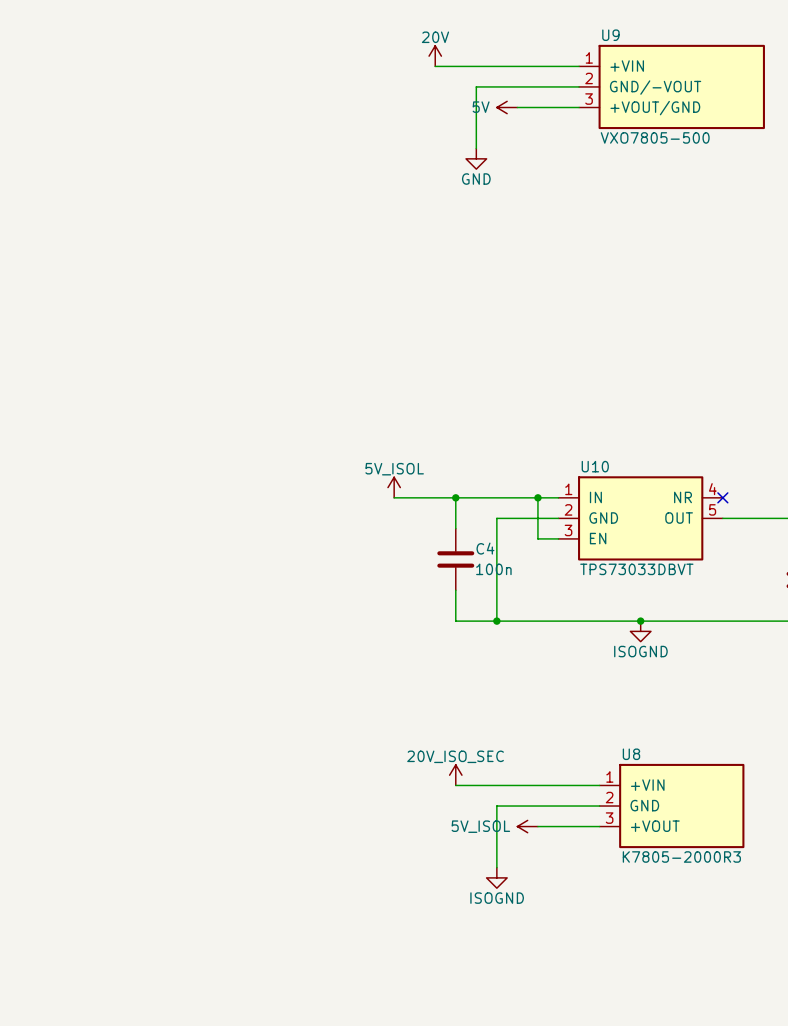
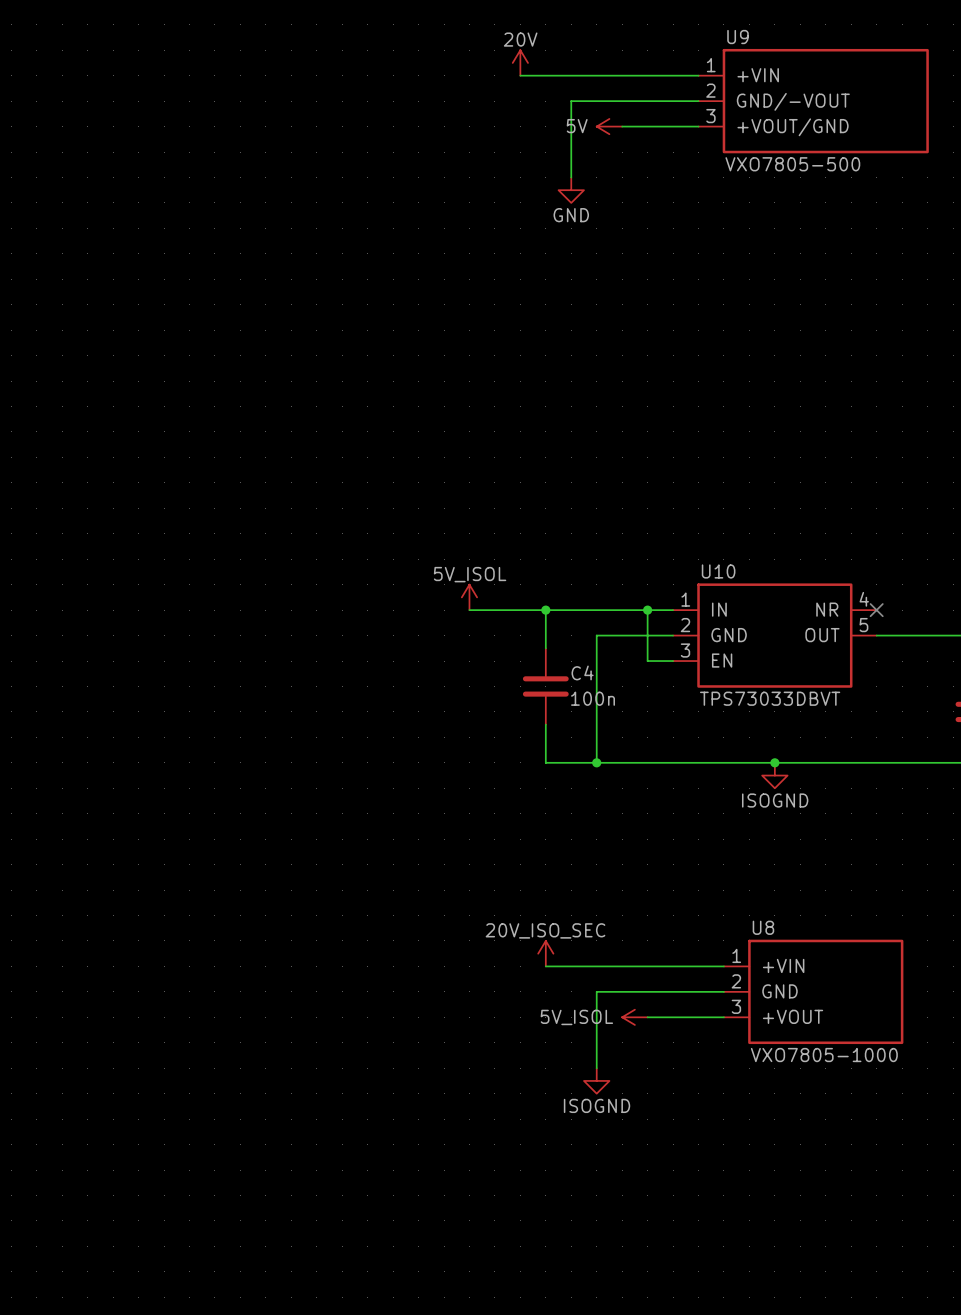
U8 value: K7805-2000R3 (681, 856) -> VXO7805-1000 (824, 1055)

